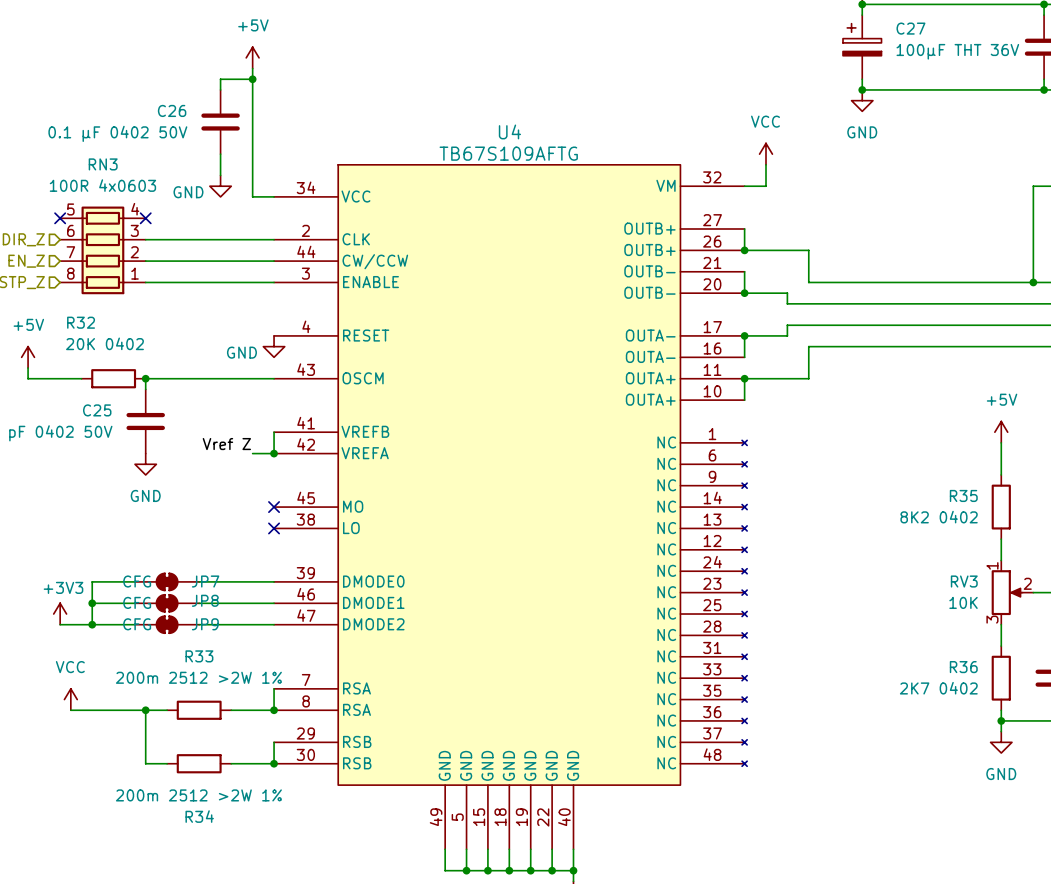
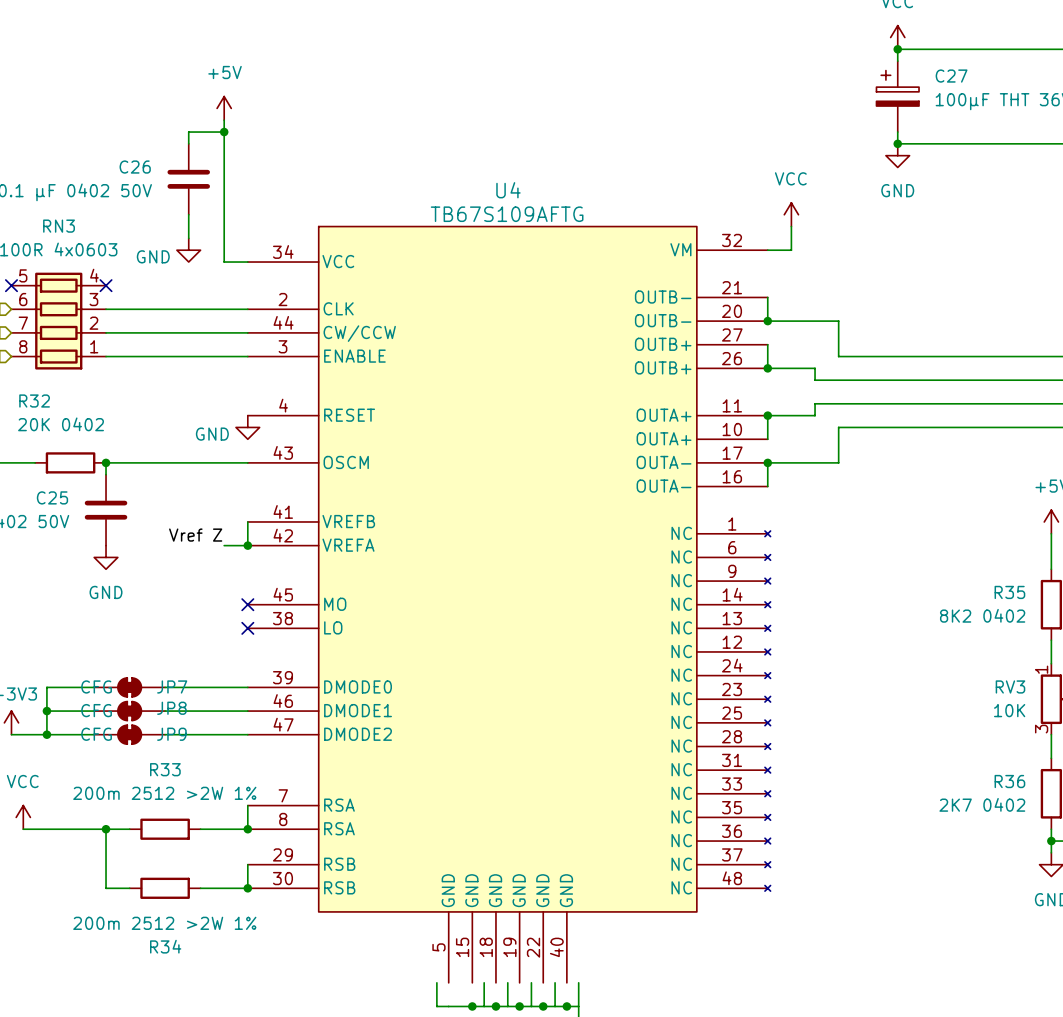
U4 symbol: [274, 164, 748, 850] -> [247, 226, 771, 983]
wire: (466, 849) (466, 870) -> none
junction: (466, 870) -> none
junction: none -> (472, 1006)
junction: (487, 870) -> none
junction: none -> (495, 1006)
junction: (509, 870) -> none
junction: none -> (519, 1006)
junction: (530, 870) -> none
junction: none -> (543, 1006)
junction: (552, 870) -> none
junction: none -> (566, 1006)
junction: (573, 870) -> none

